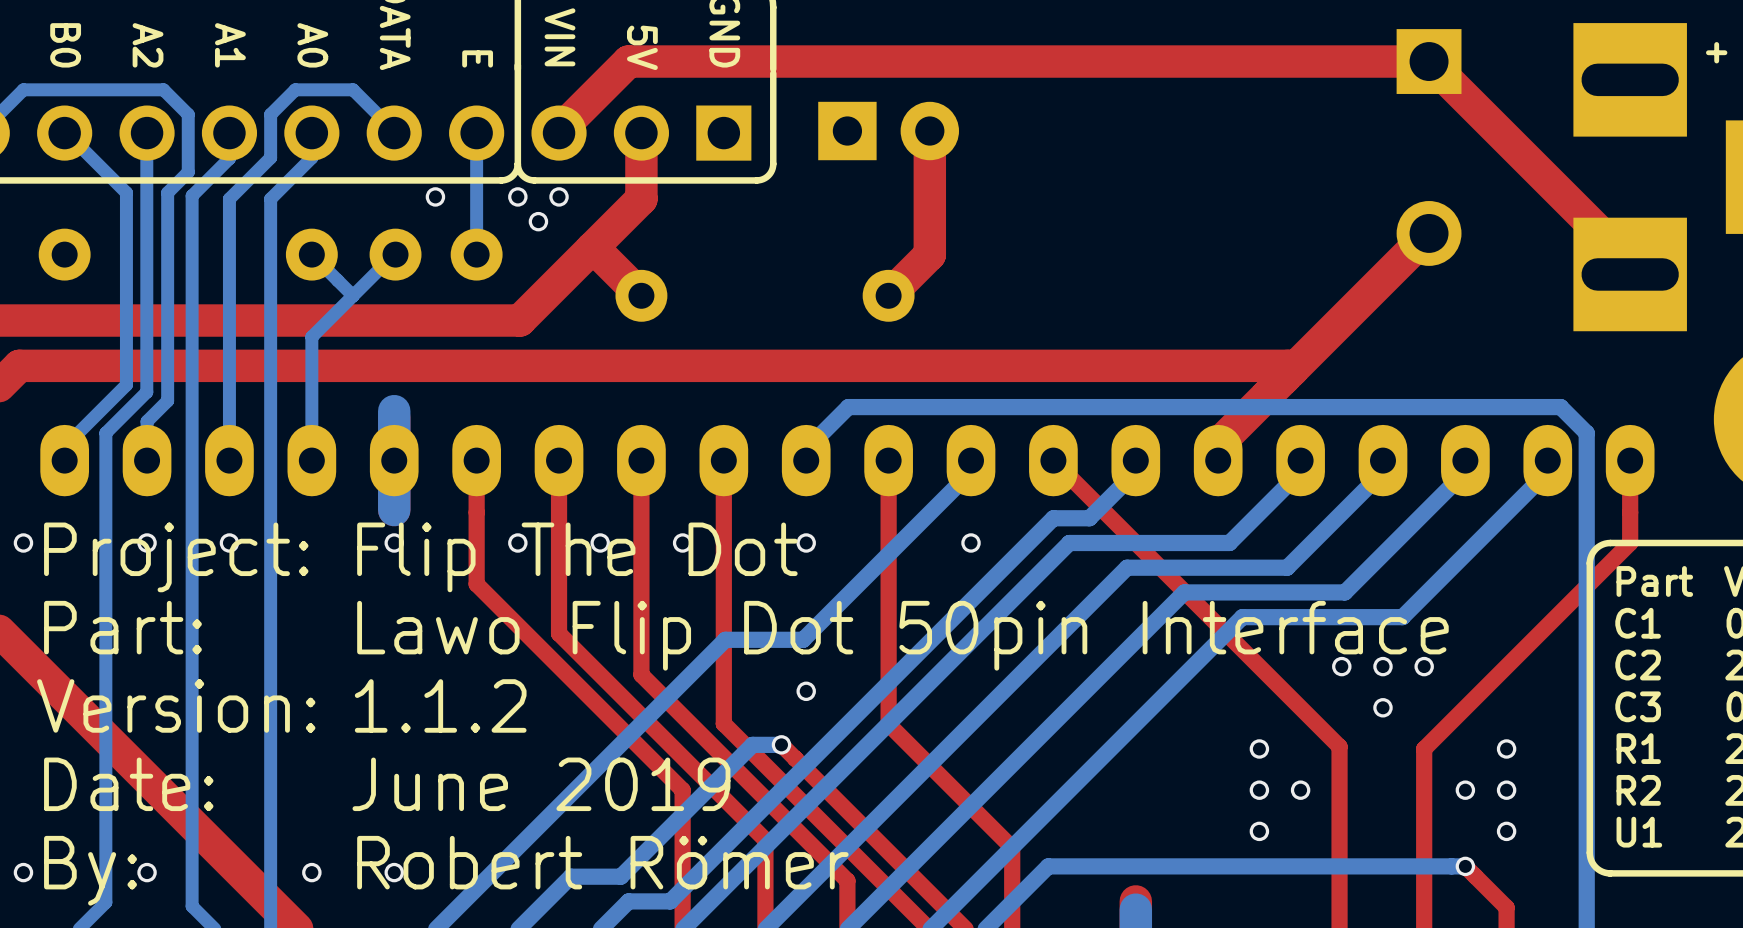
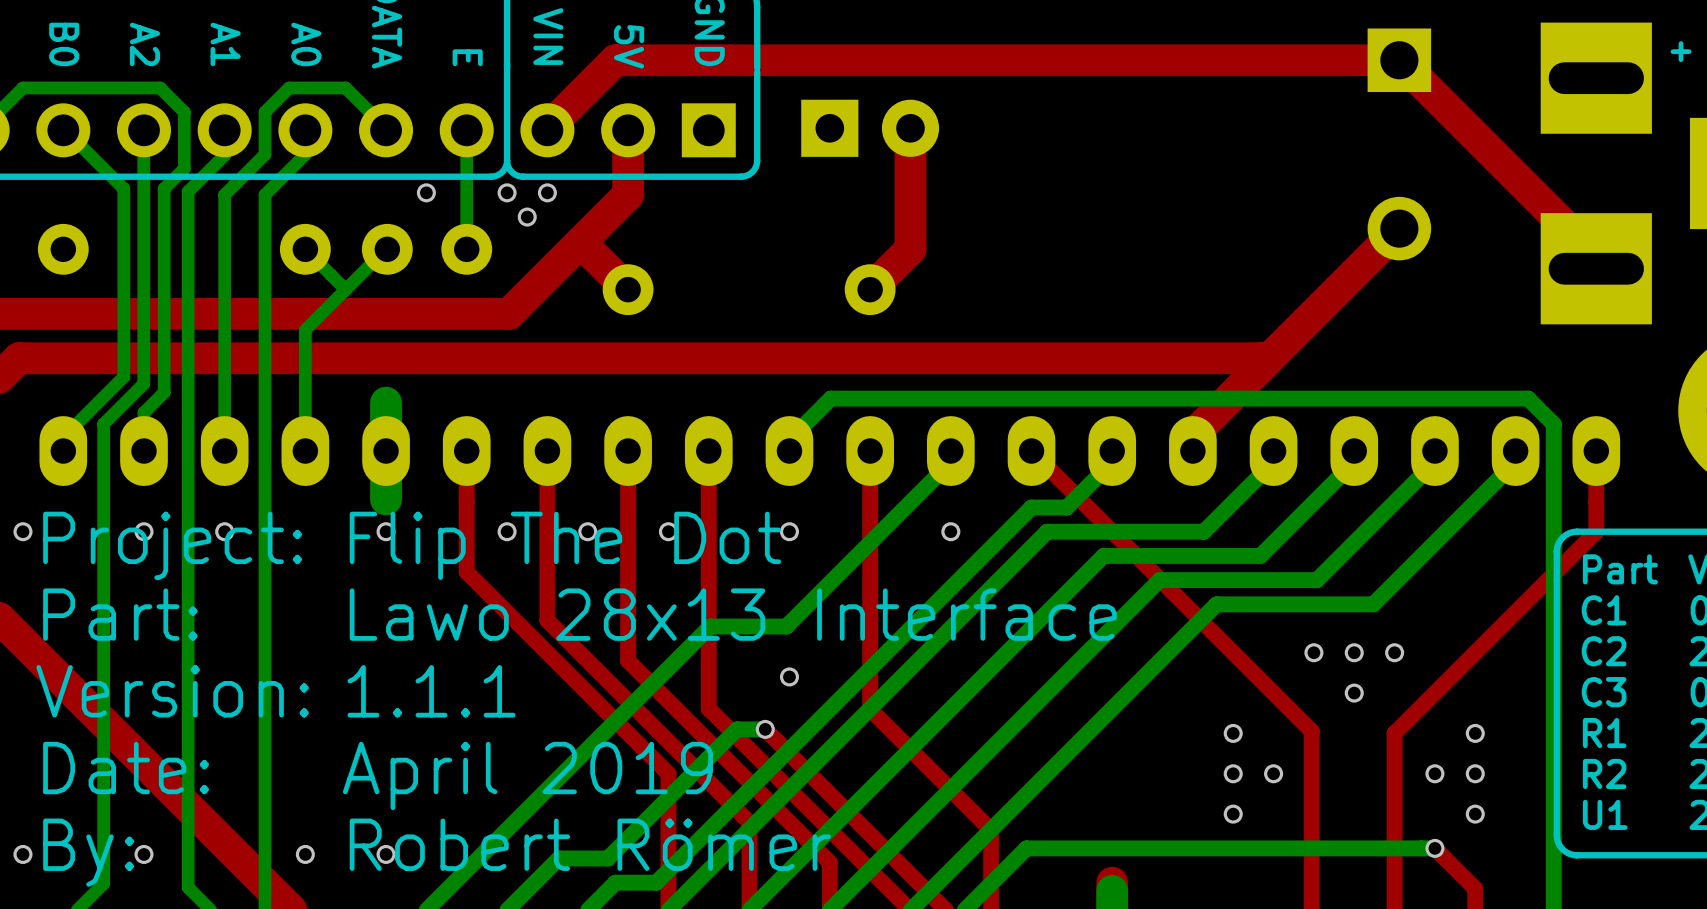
text: Lawo Flip Dot 50pin Interface (902, 635) -> Lawo 28x13 Interface (733, 614)
text: 1.1.2 (440, 705) -> 1.1.1 (431, 691)
text: June 2019 (541, 784) -> April 2019 (527, 775)

